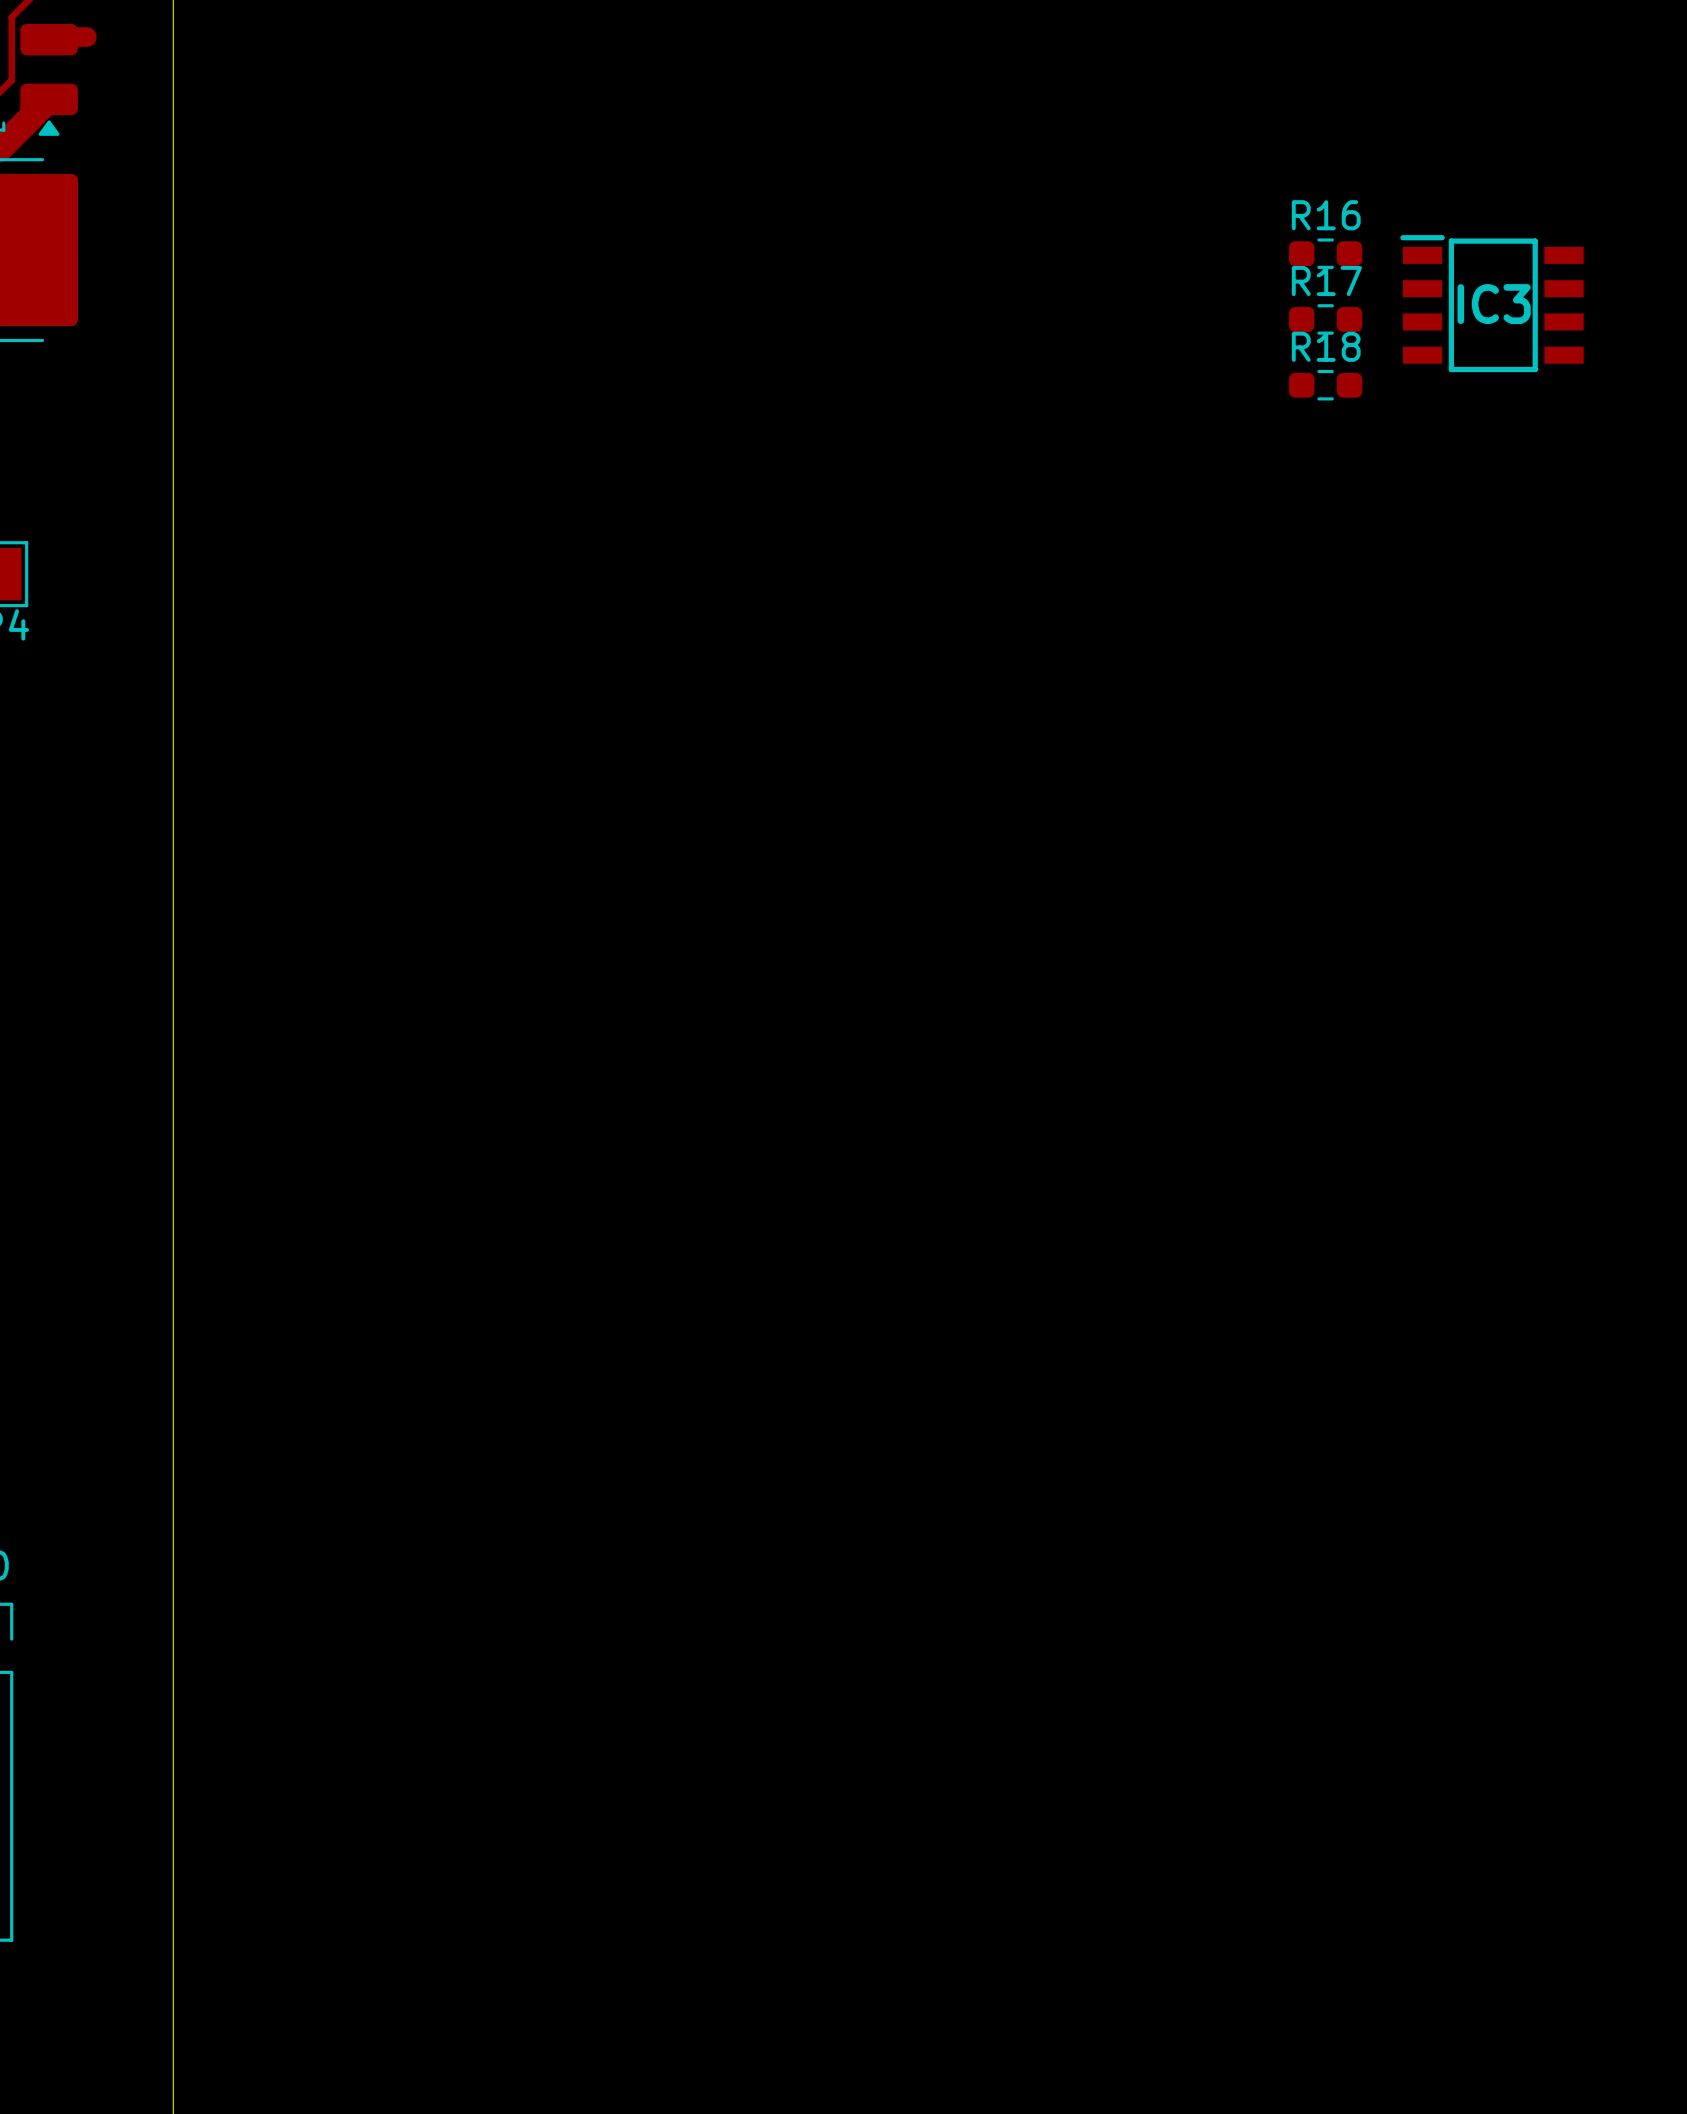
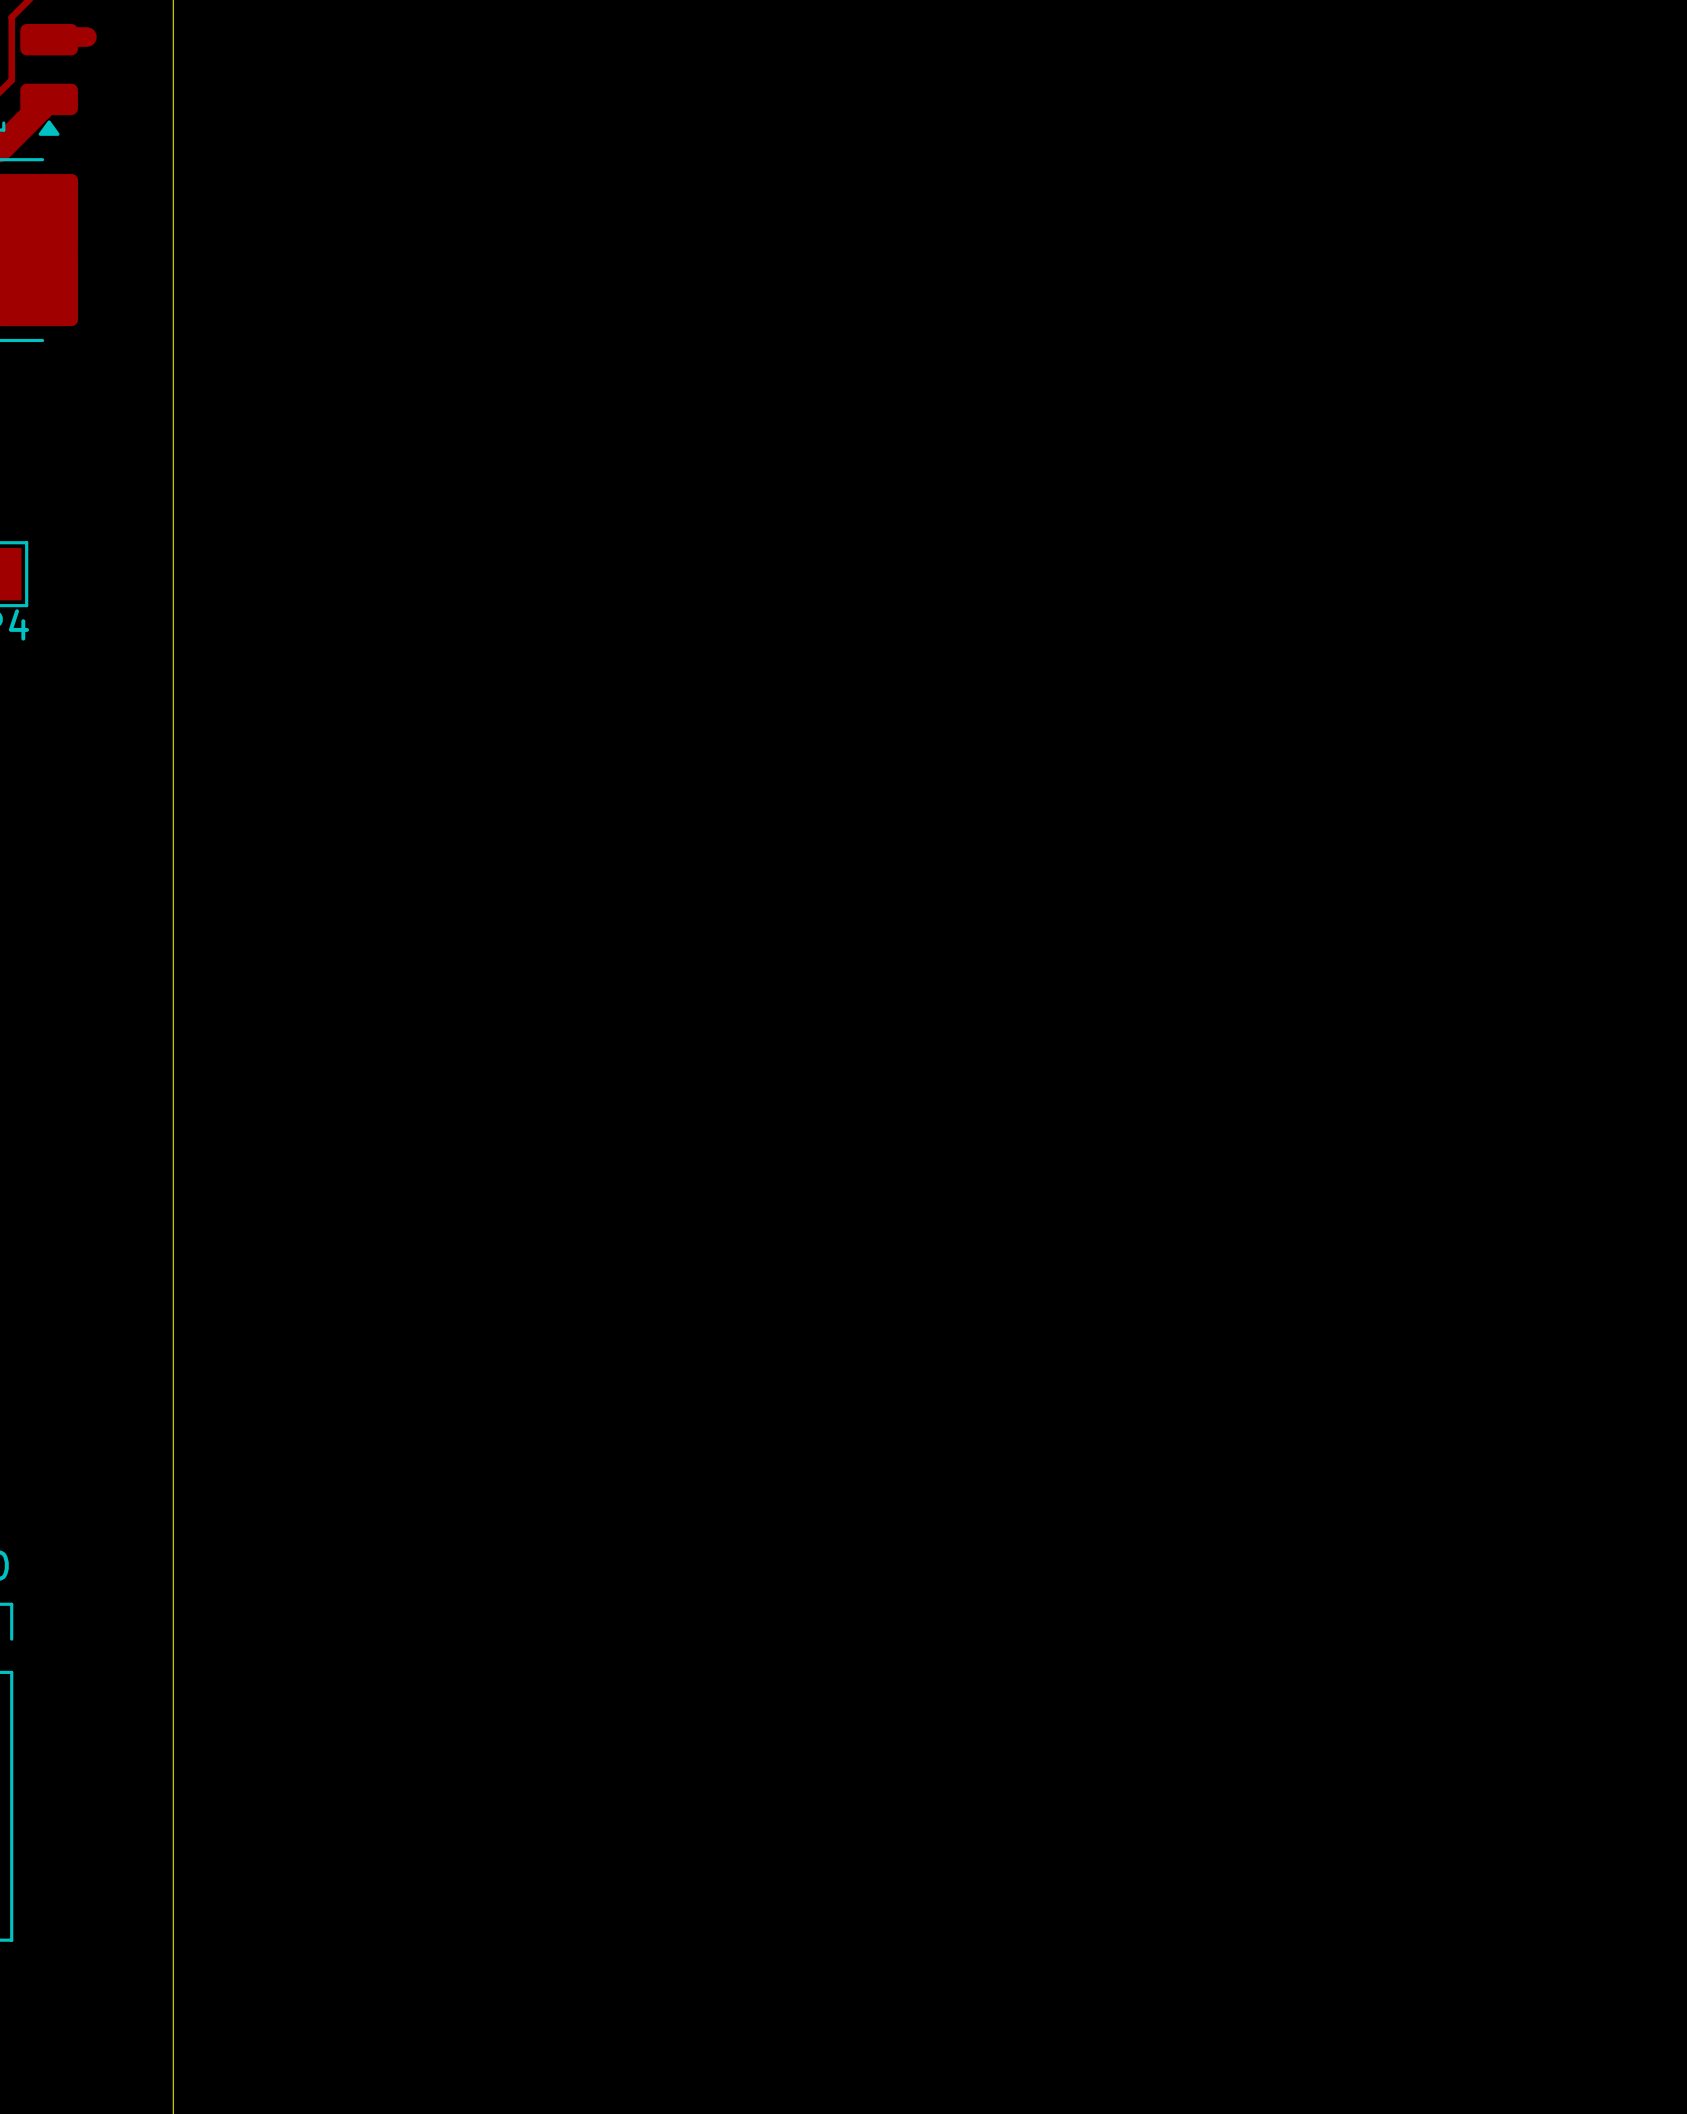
R16: (1325, 253) -> none
IC3: (1491, 303) -> none
R17: (1325, 319) -> none
R18: (1325, 385) -> none

